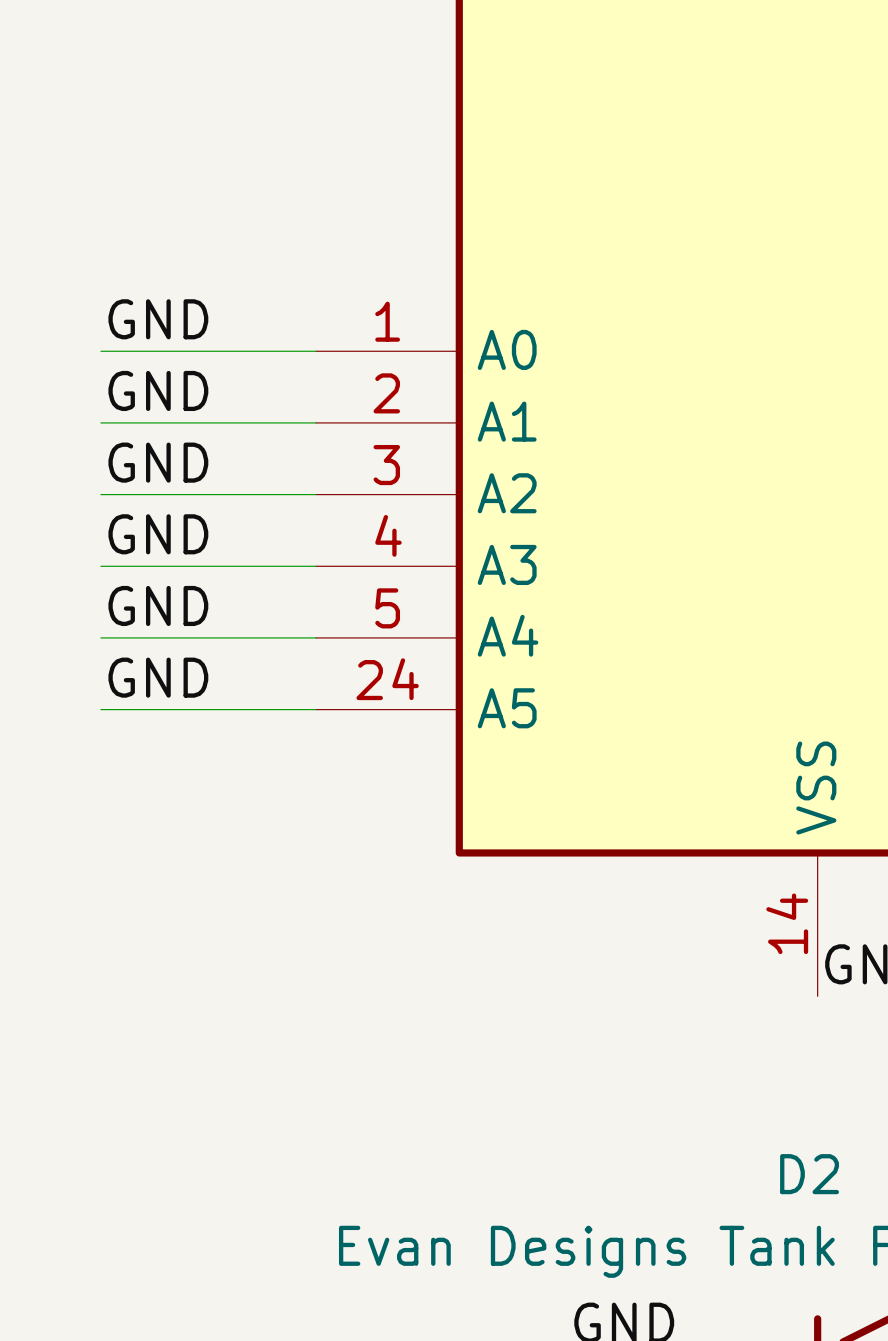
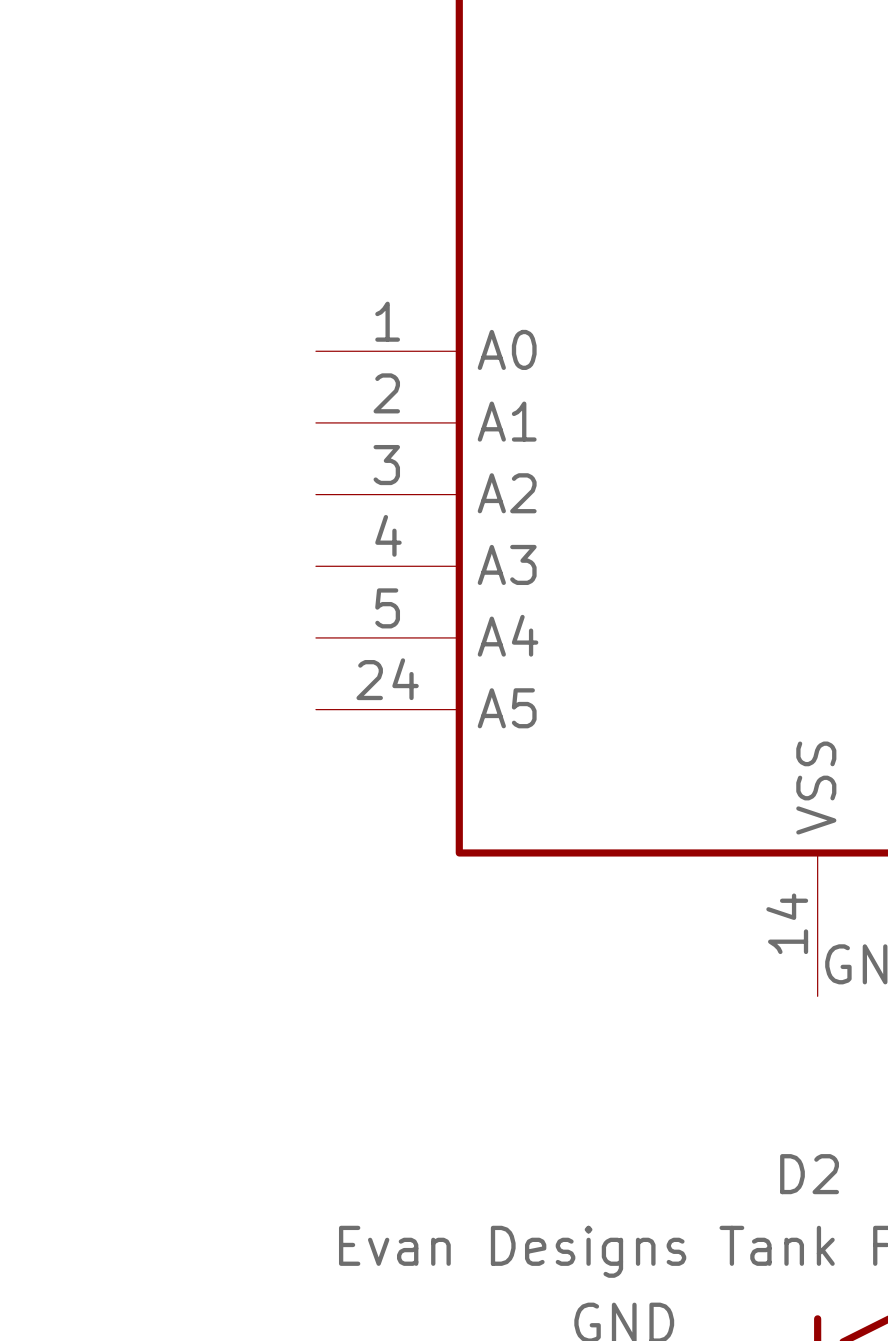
label: GND (158, 319) -> none
wire: (100, 351) (315, 351) -> none
label: GND (158, 390) -> none
wire: (100, 422) (315, 422) -> none
label: GND (158, 462) -> none
wire: (100, 494) (315, 494) -> none
label: GND (158, 534) -> none
wire: (100, 566) (315, 566) -> none
label: GND (158, 605) -> none
wire: (100, 637) (315, 637) -> none
label: GND (158, 677) -> none
wire: (100, 709) (315, 709) -> none

